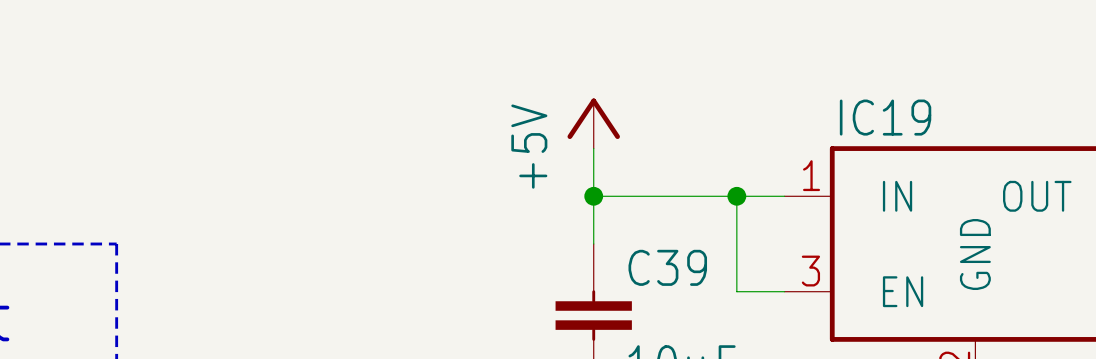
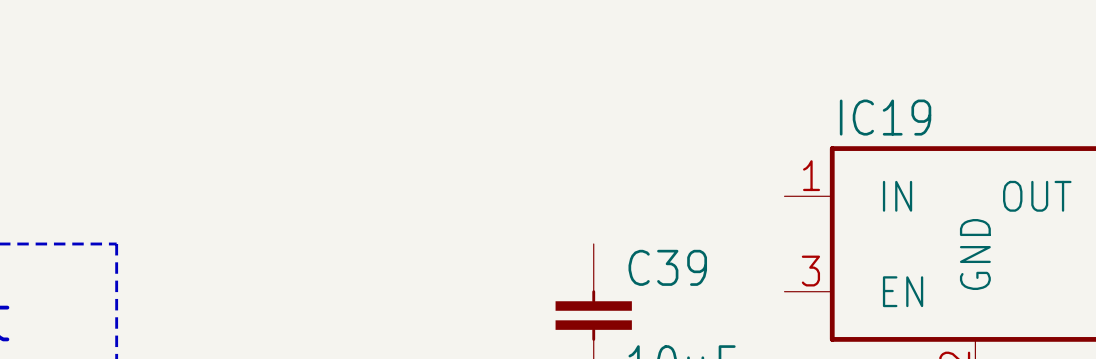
power symbol: +5V (593, 123) -> none
wire: (593, 148) (593, 243) -> none
wire: (593, 196) (784, 196) -> none
junction: (593, 196) -> none
wire: (736, 196) (736, 291) (784, 291) -> none
junction: (736, 196) -> none

